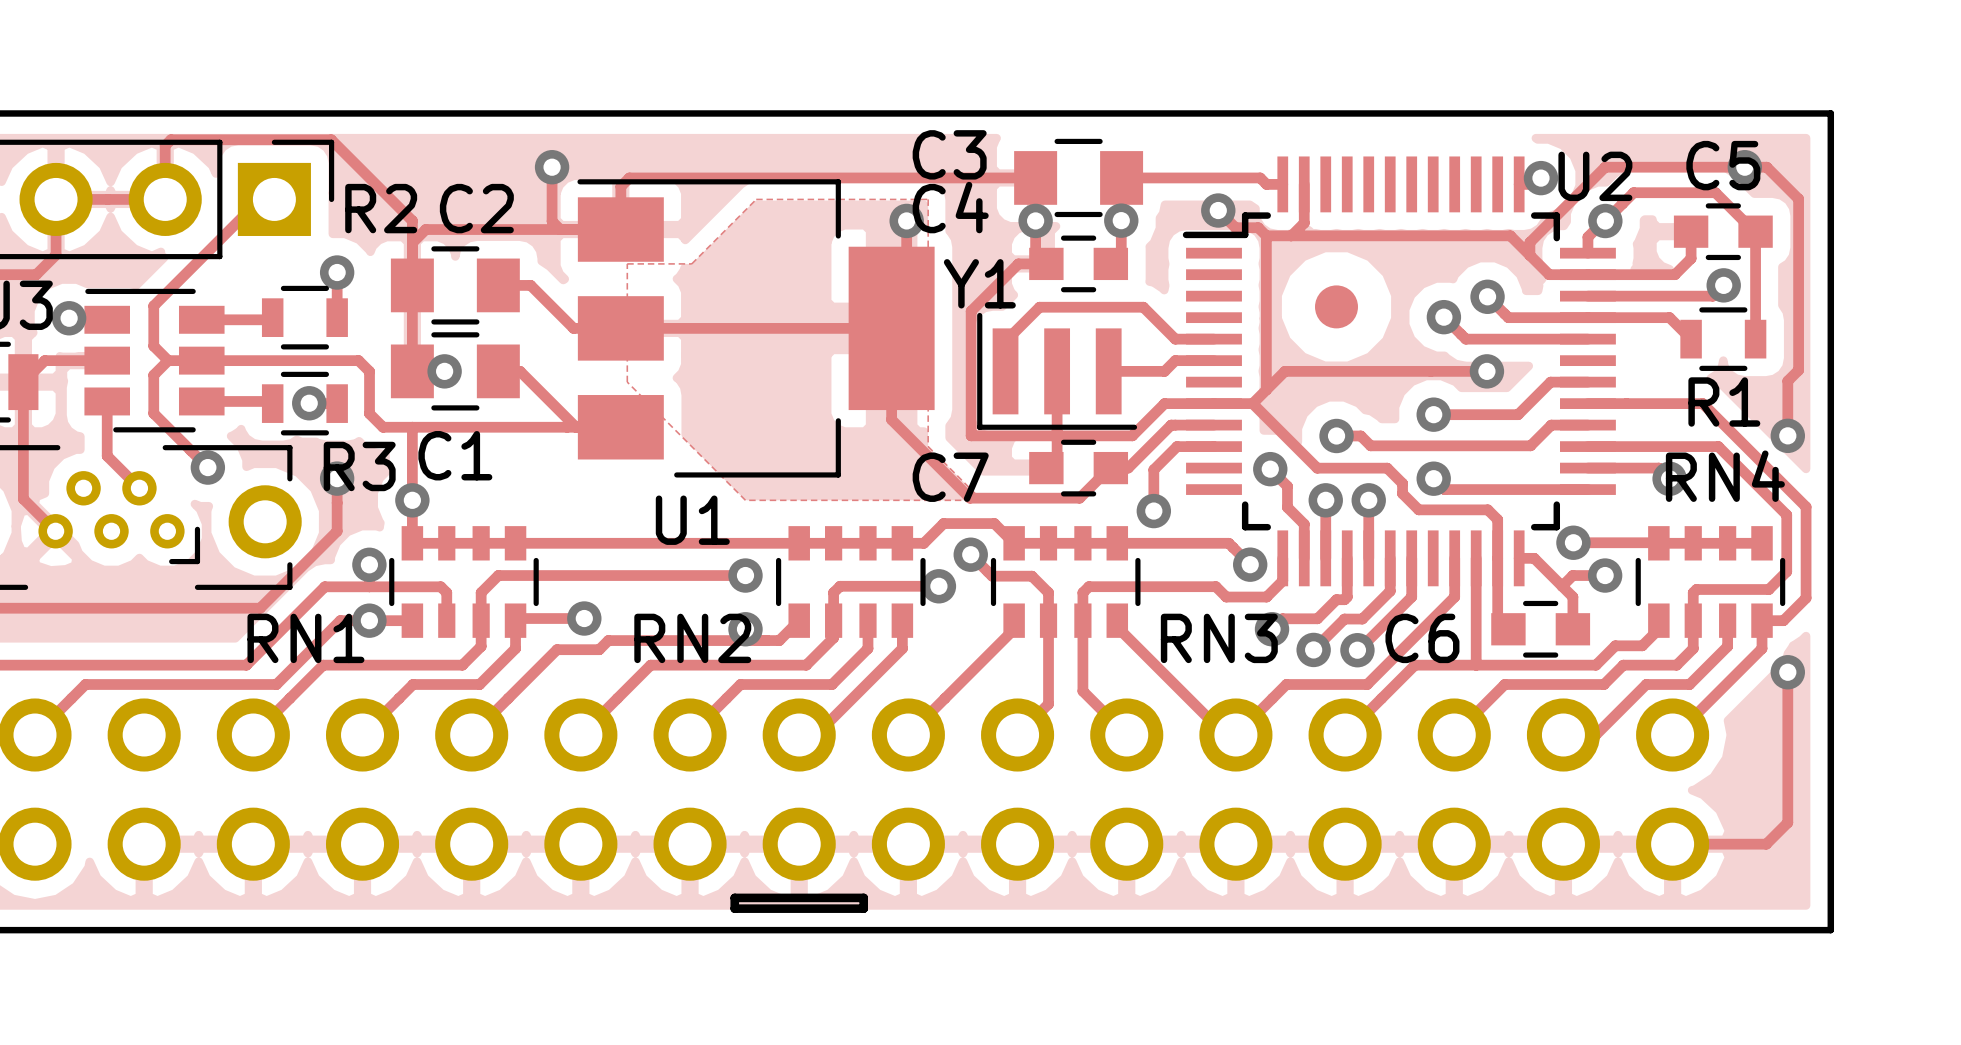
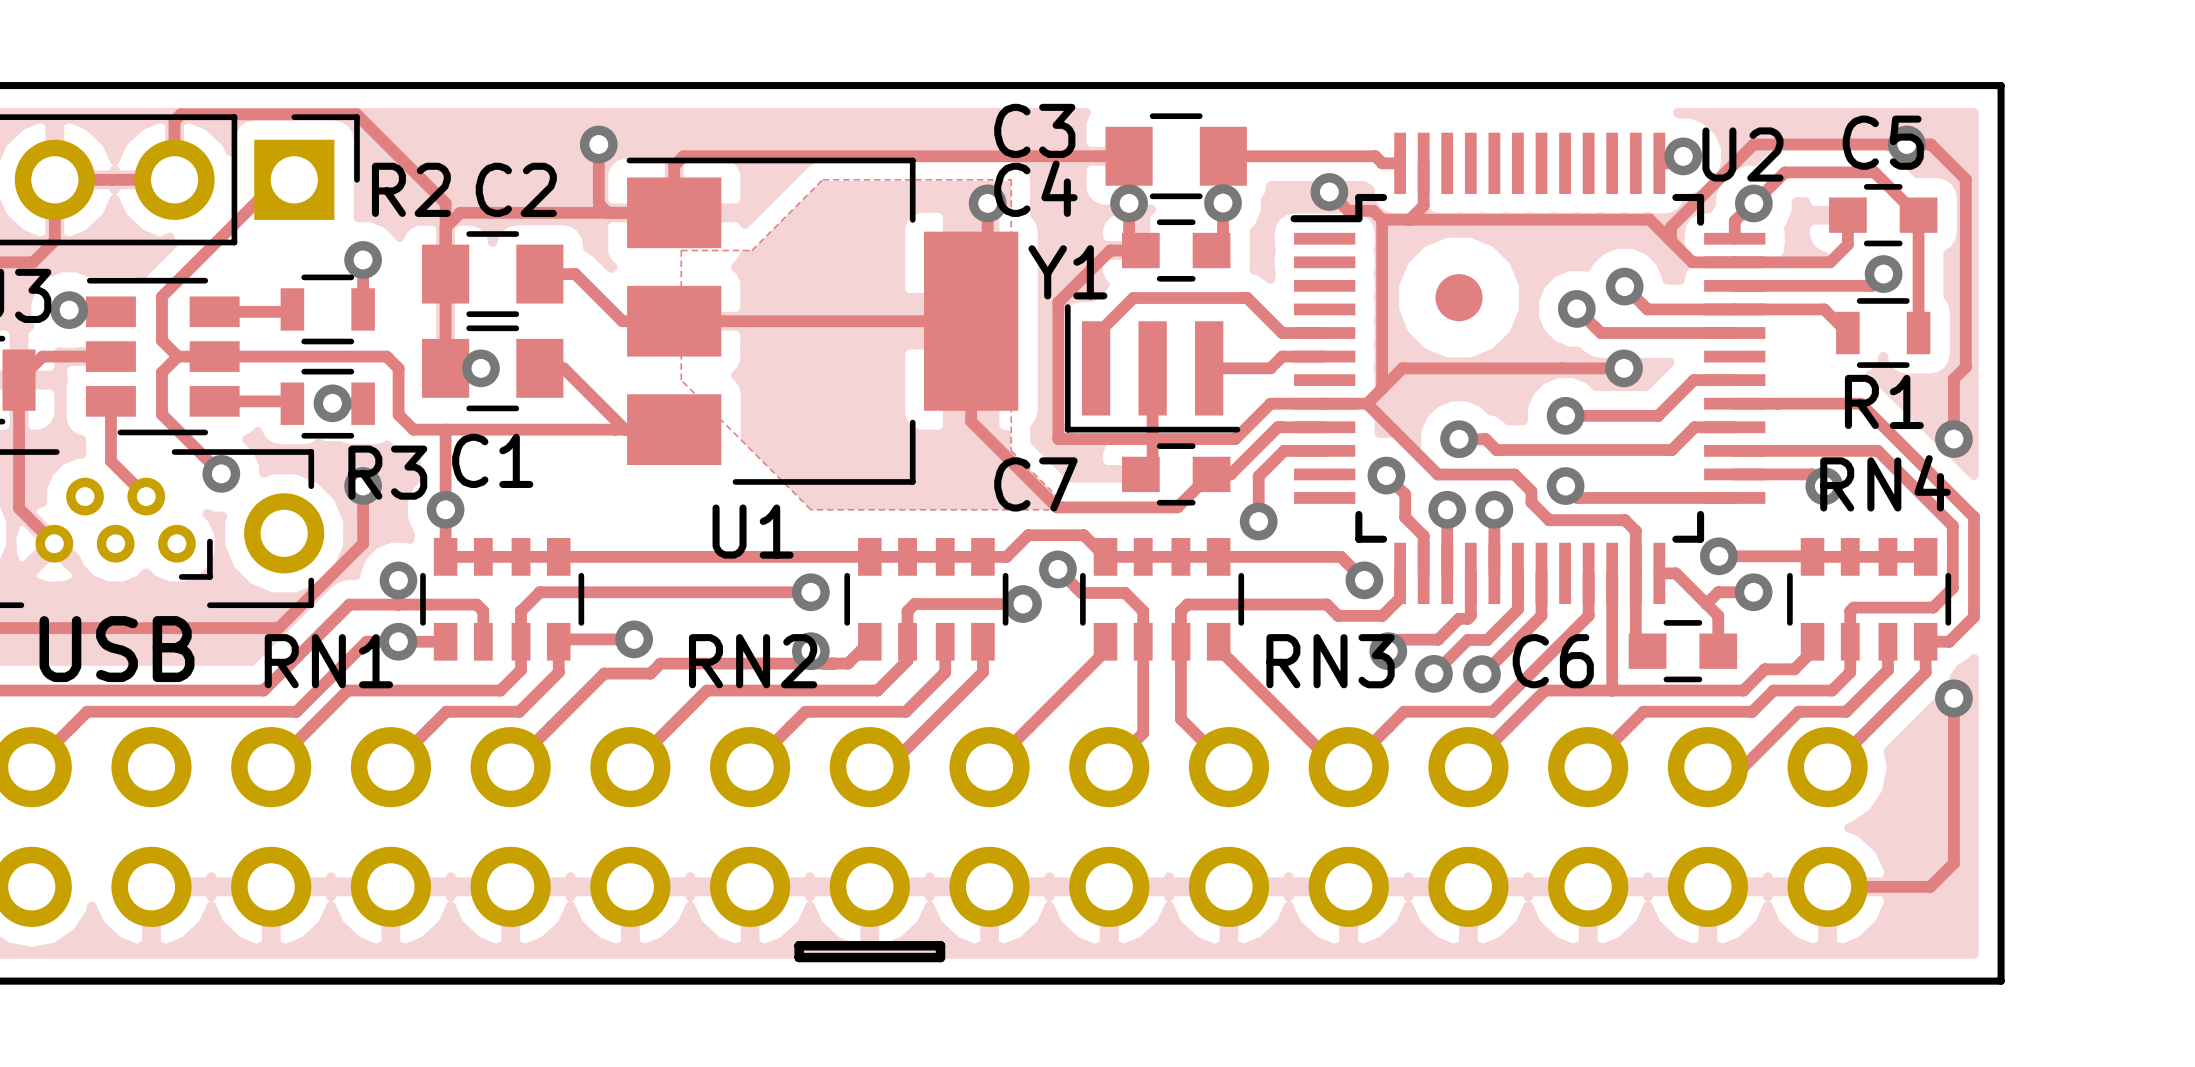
text: none -> USB (117, 649)

